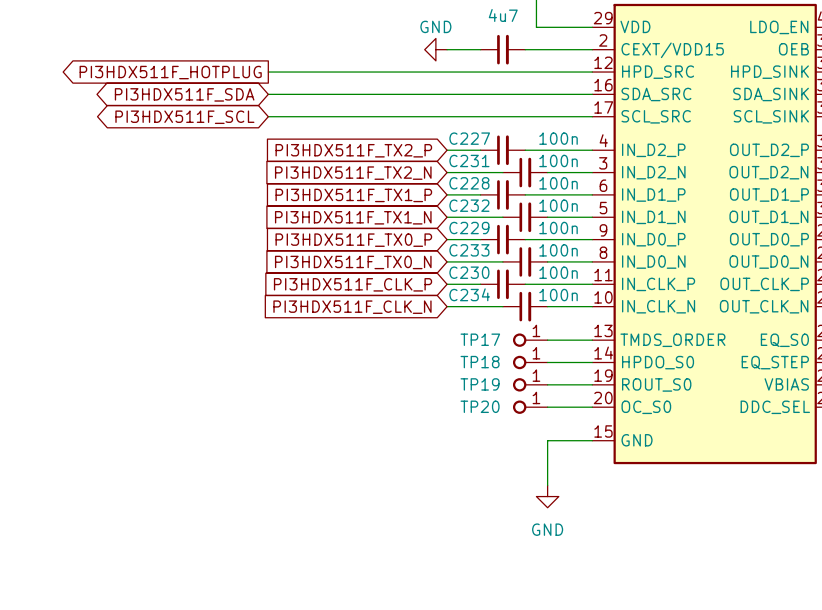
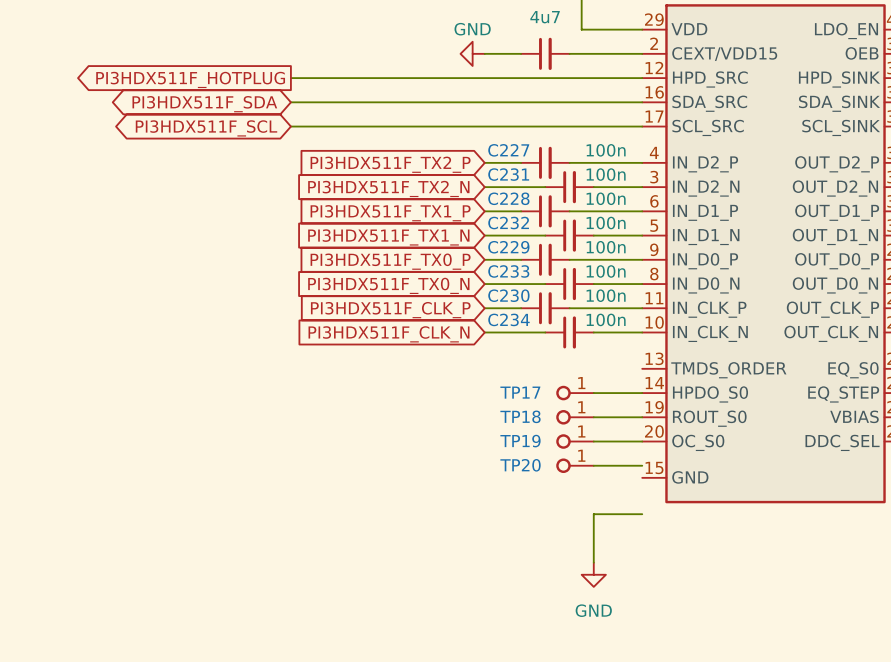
TP17: (530, 340) -> none
wire: (547, 340) (592, 340) -> (593, 465) (642, 465)
TP18 name: TP18 (480, 362) -> TP17 (520, 392)
TP19 name: TP19 (480, 384) -> TP18 (520, 416)
TP20 name: TP20 (480, 406) -> TP19 (520, 441)
TP20: none -> (575, 465)
wire: (592, 440) (547, 440) (547, 474) -> (642, 514) (593, 514)
wire: none -> (593, 526) (593, 562)
power symbol position: GND (547, 496) -> GND (593, 574)

